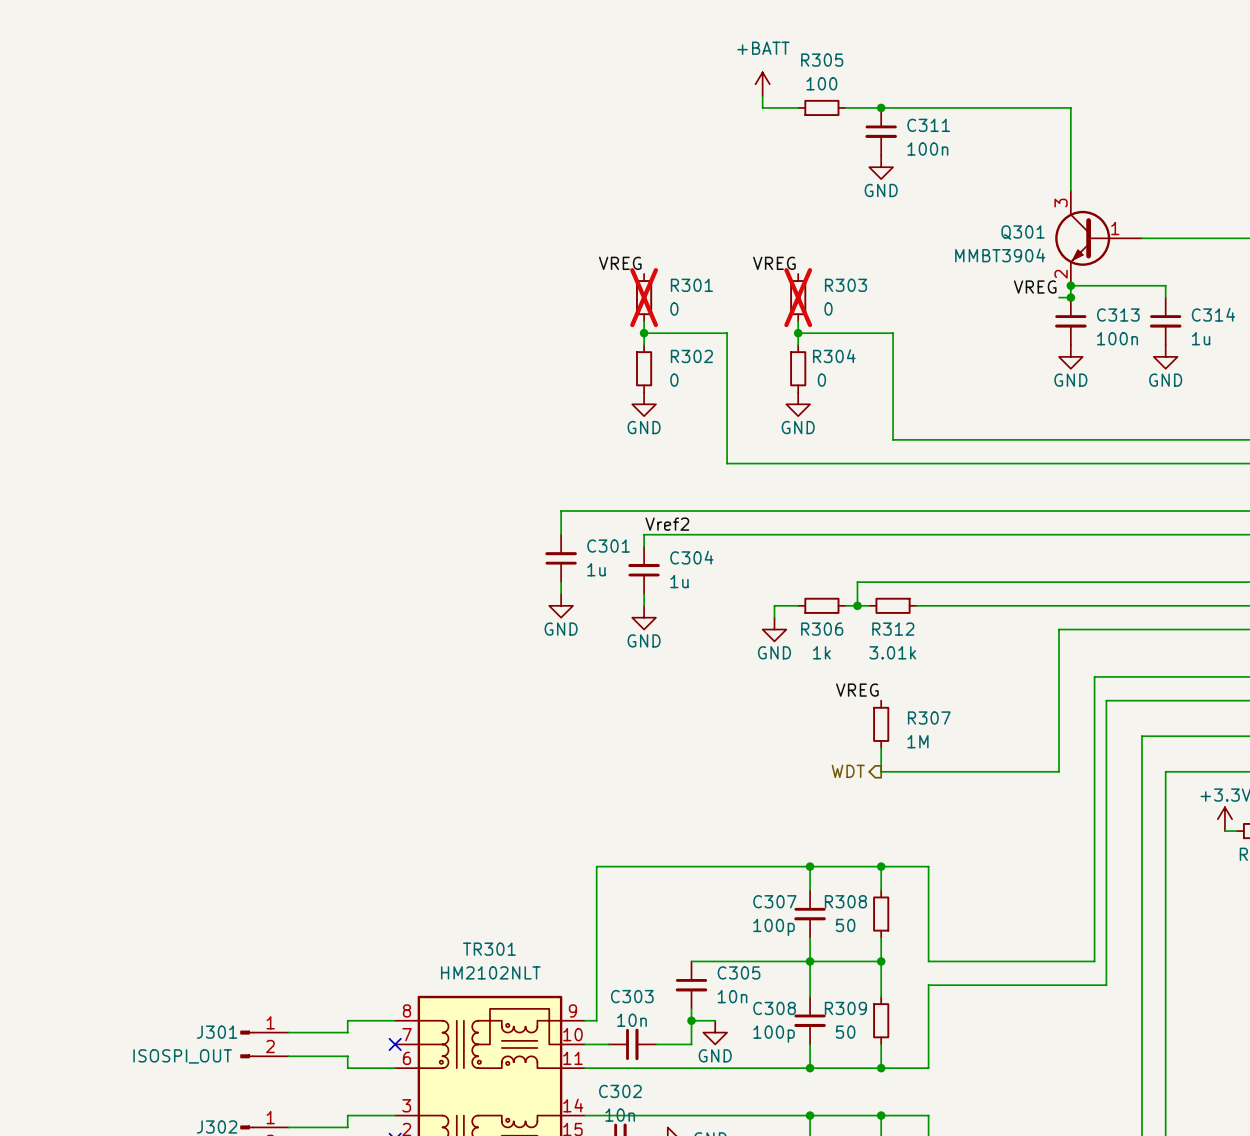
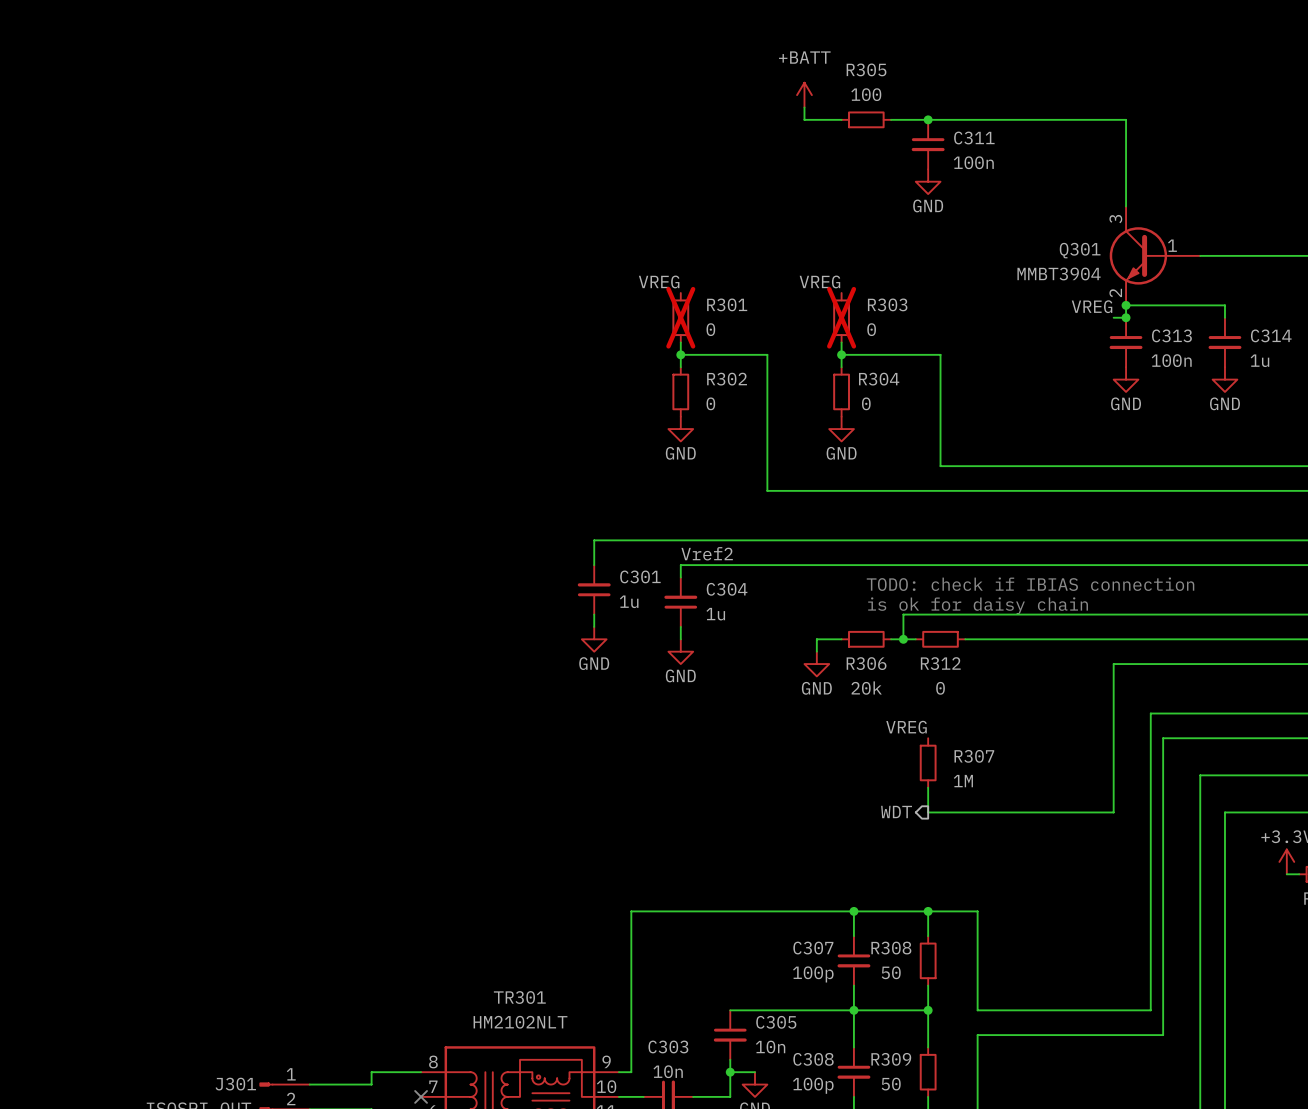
text: none -> TODO: check if IBIAS connection (1030, 584)
text: none -> is ok for daisy chain (978, 605)
R306 value: 1k (821, 652) -> 20k (866, 688)
R312 value: 3.01k (892, 652) -> 0 (940, 688)

